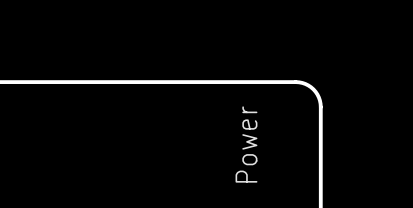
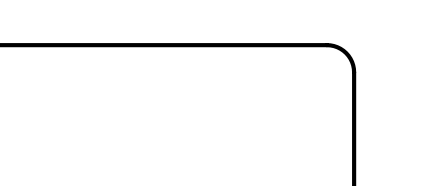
text: Power (246, 144) -> none

